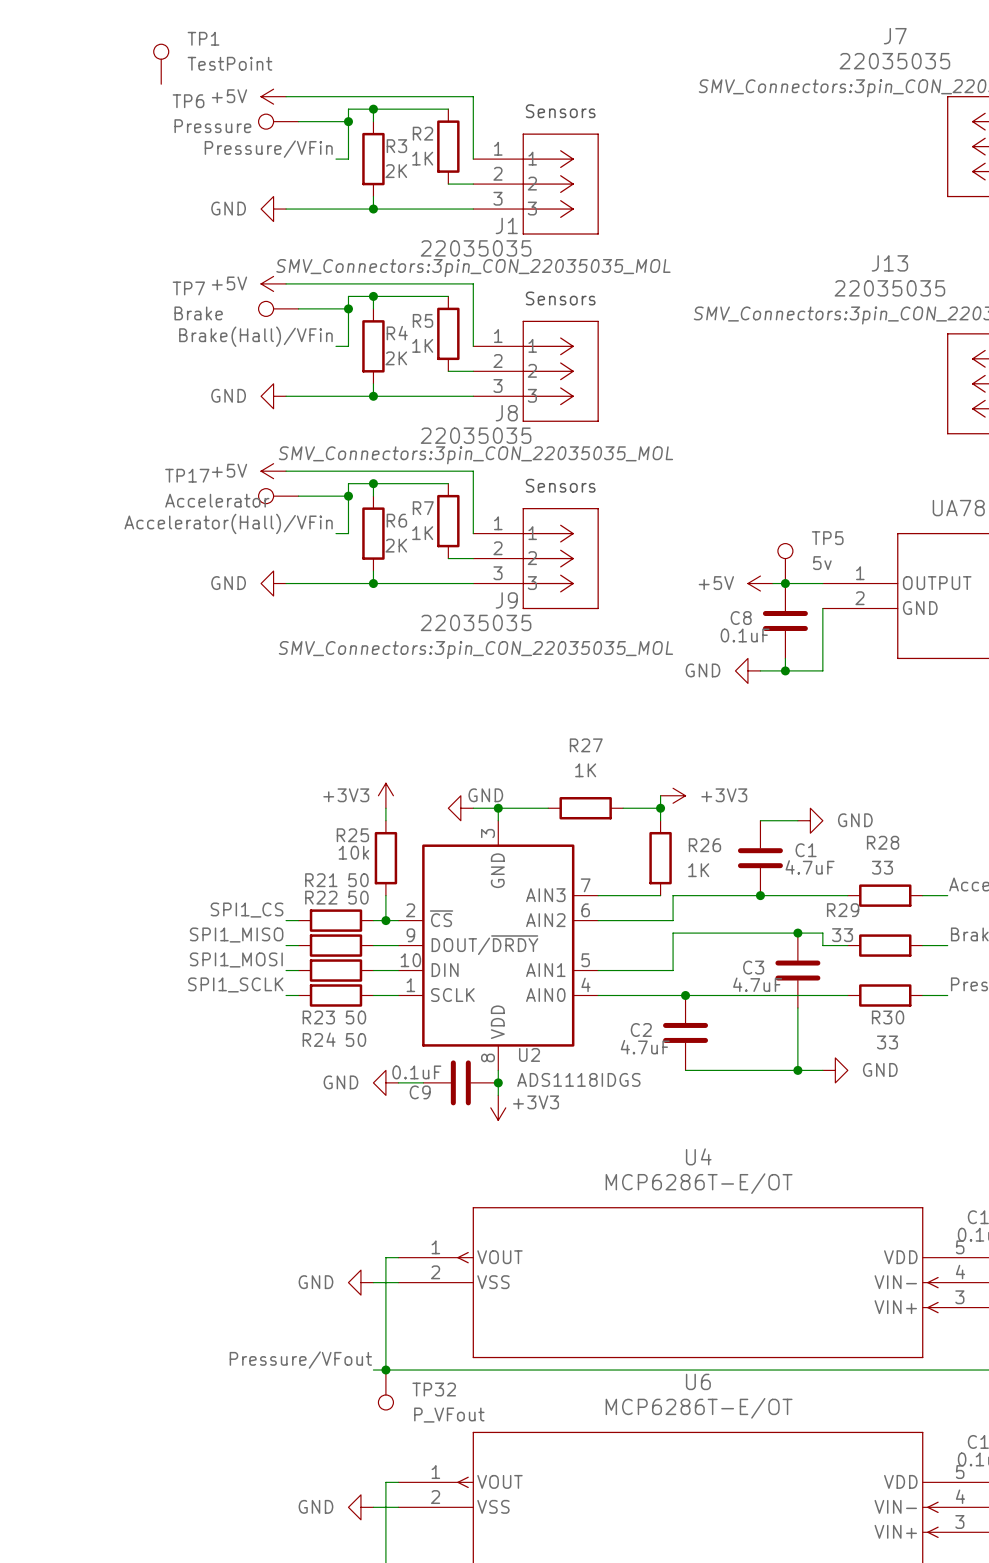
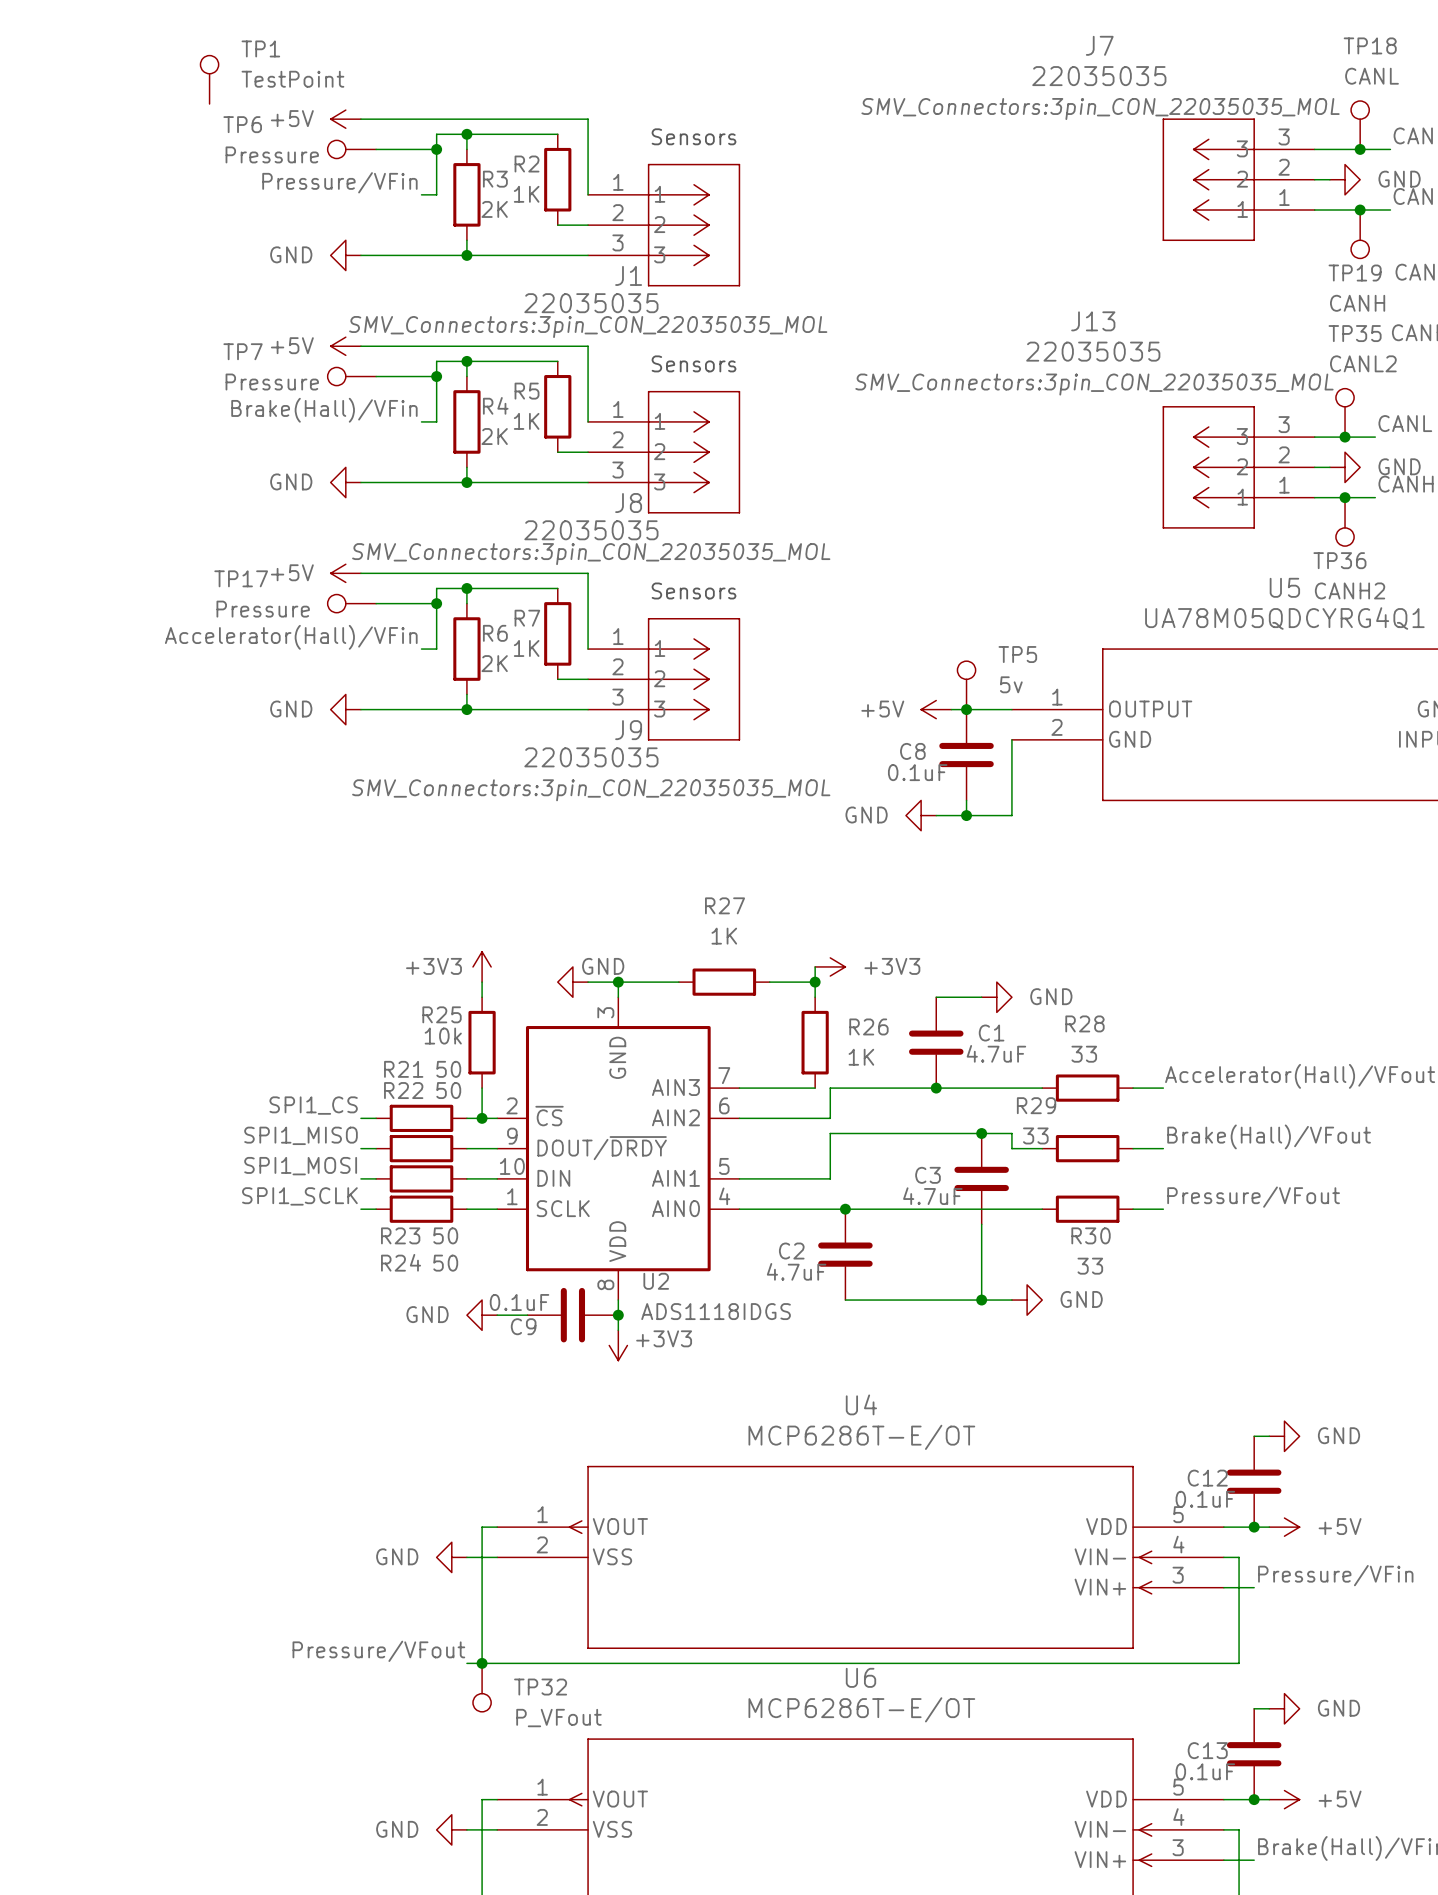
TP7 value: Brake (198, 313) -> Pressure (272, 382)
TP17 value: Accelerator (217, 500) -> Pressure (263, 609)

